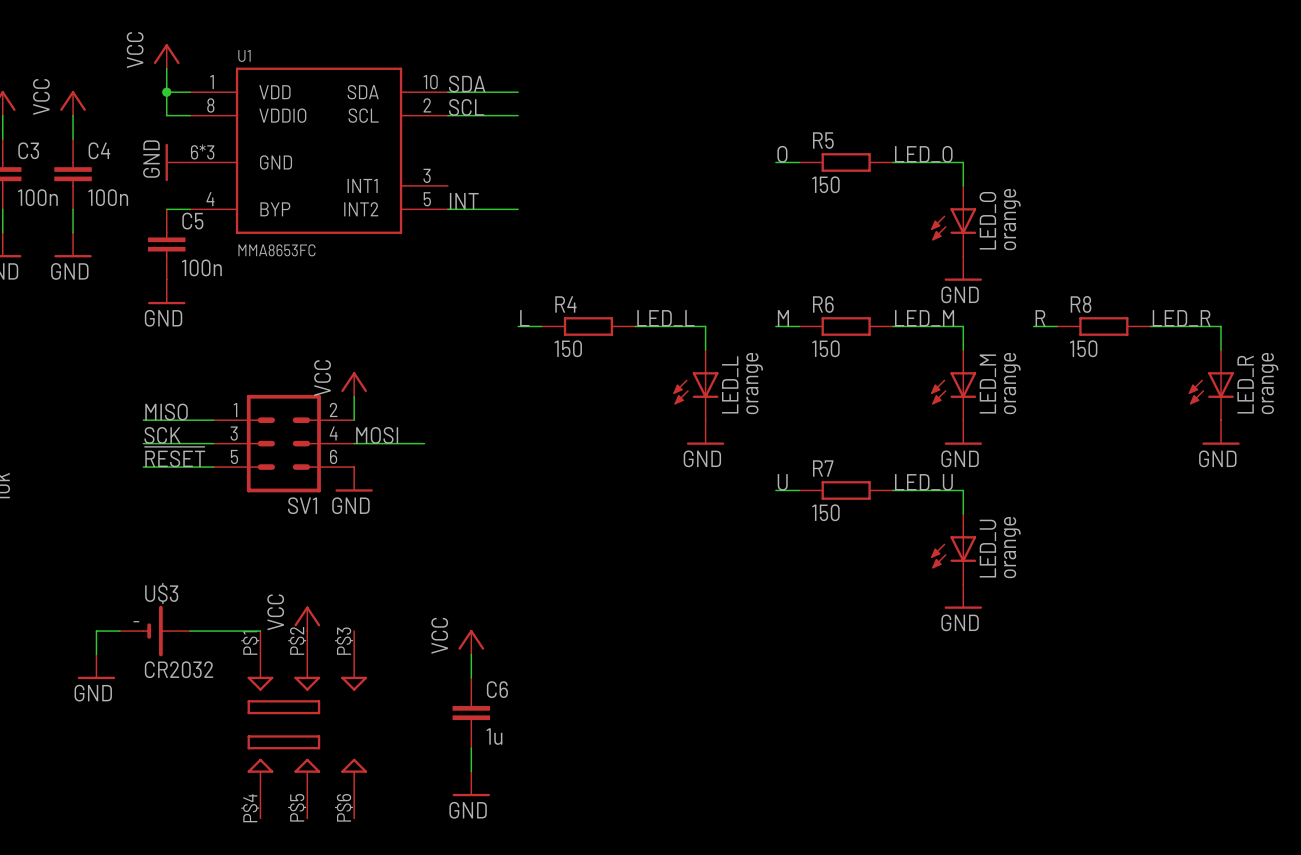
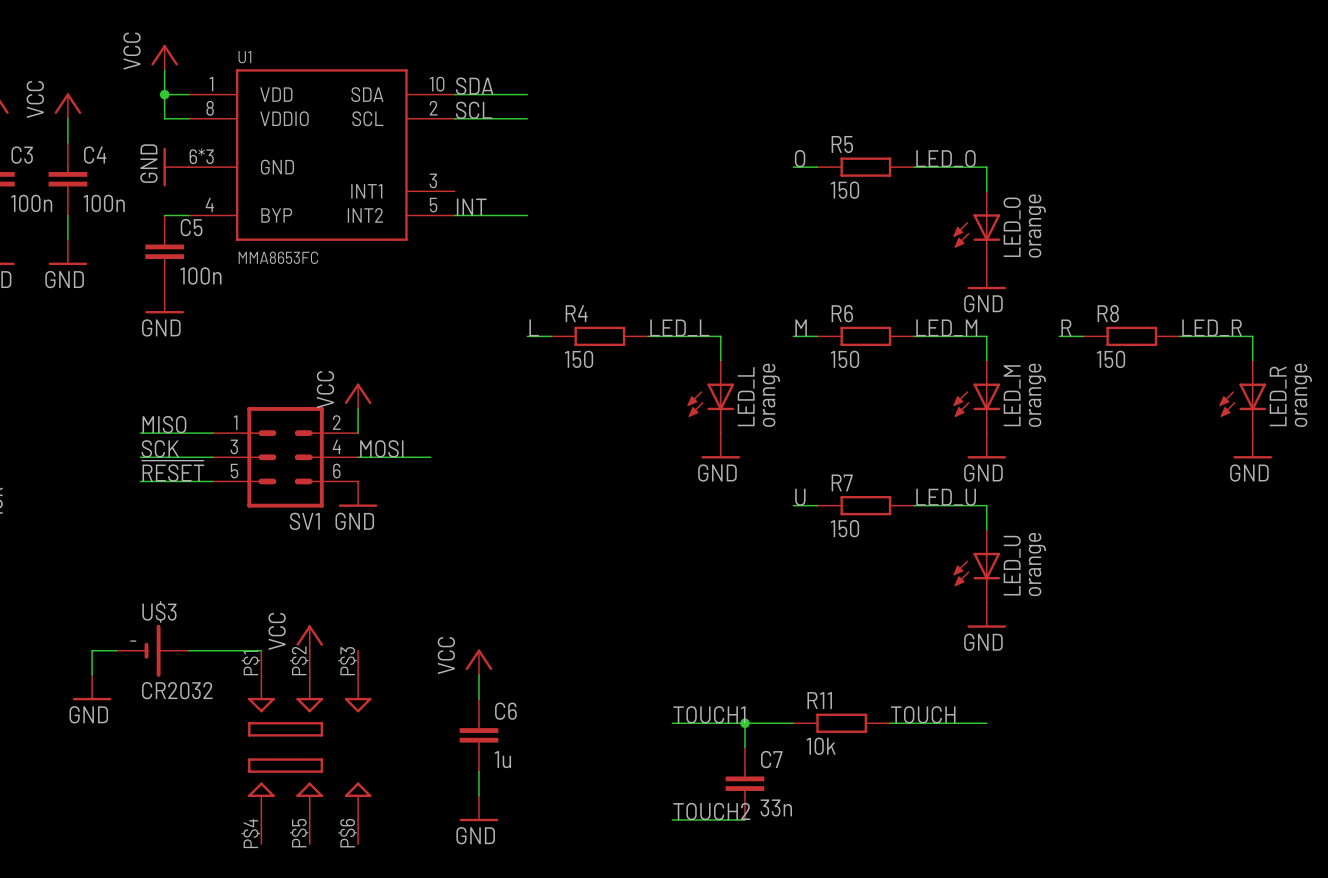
label: none -> TOUCH1 (709, 714)
label: none -> TOUCH (923, 714)
wire: none -> (672, 723) (793, 723)
wire: none -> (744, 723) (744, 747)
junction: none -> (744, 723)
R11: none -> 10k (841, 723)
wire: none -> (890, 723) (986, 723)
C7: none -> 33n (744, 783)
label: none -> TOUCH2 (711, 811)
wire: none -> (672, 819) (744, 819)

